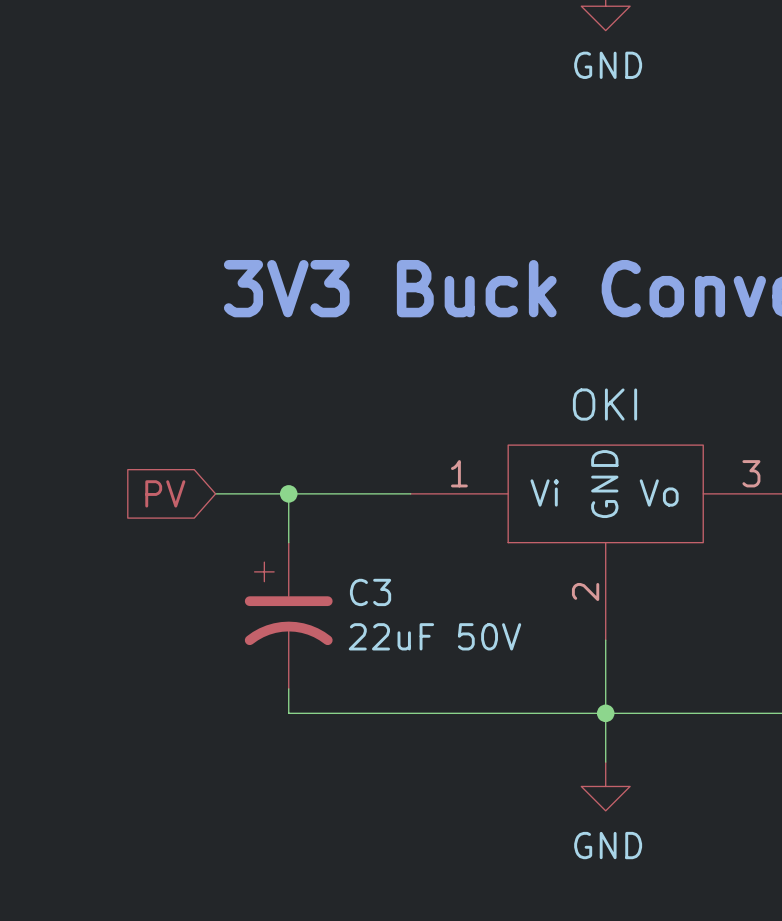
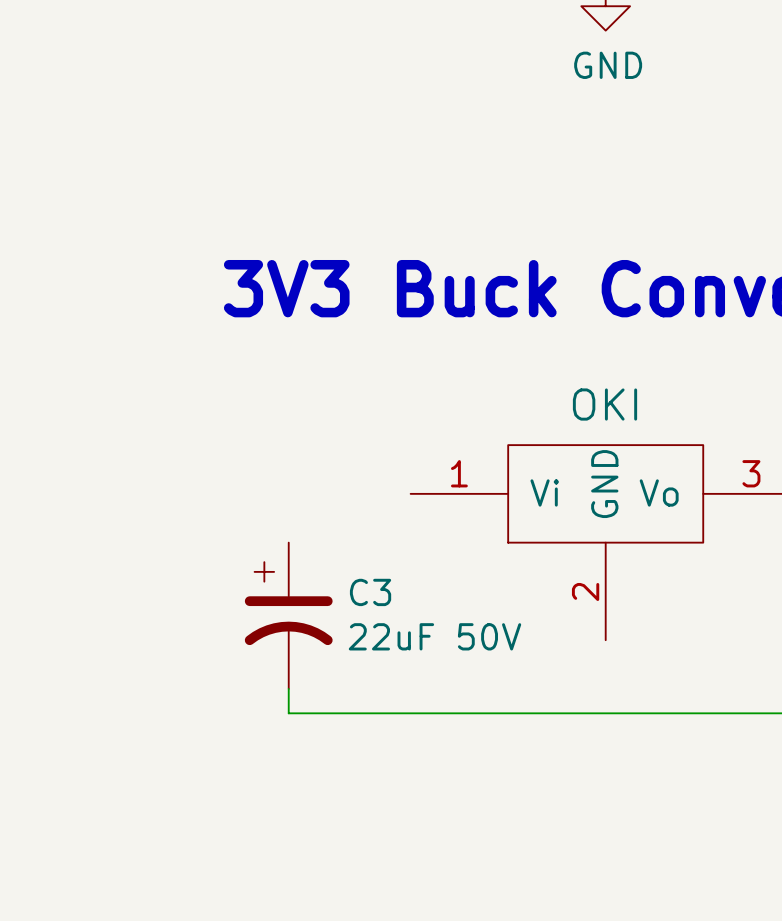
global label: PV (165, 493) -> none
wire: (215, 493) (410, 493) -> none
wire: (288, 493) (288, 542) -> none
junction: (288, 493) -> none
wire: (605, 640) (605, 762) -> none
junction: (605, 713) -> none
power symbol: GND (605, 786) -> none

